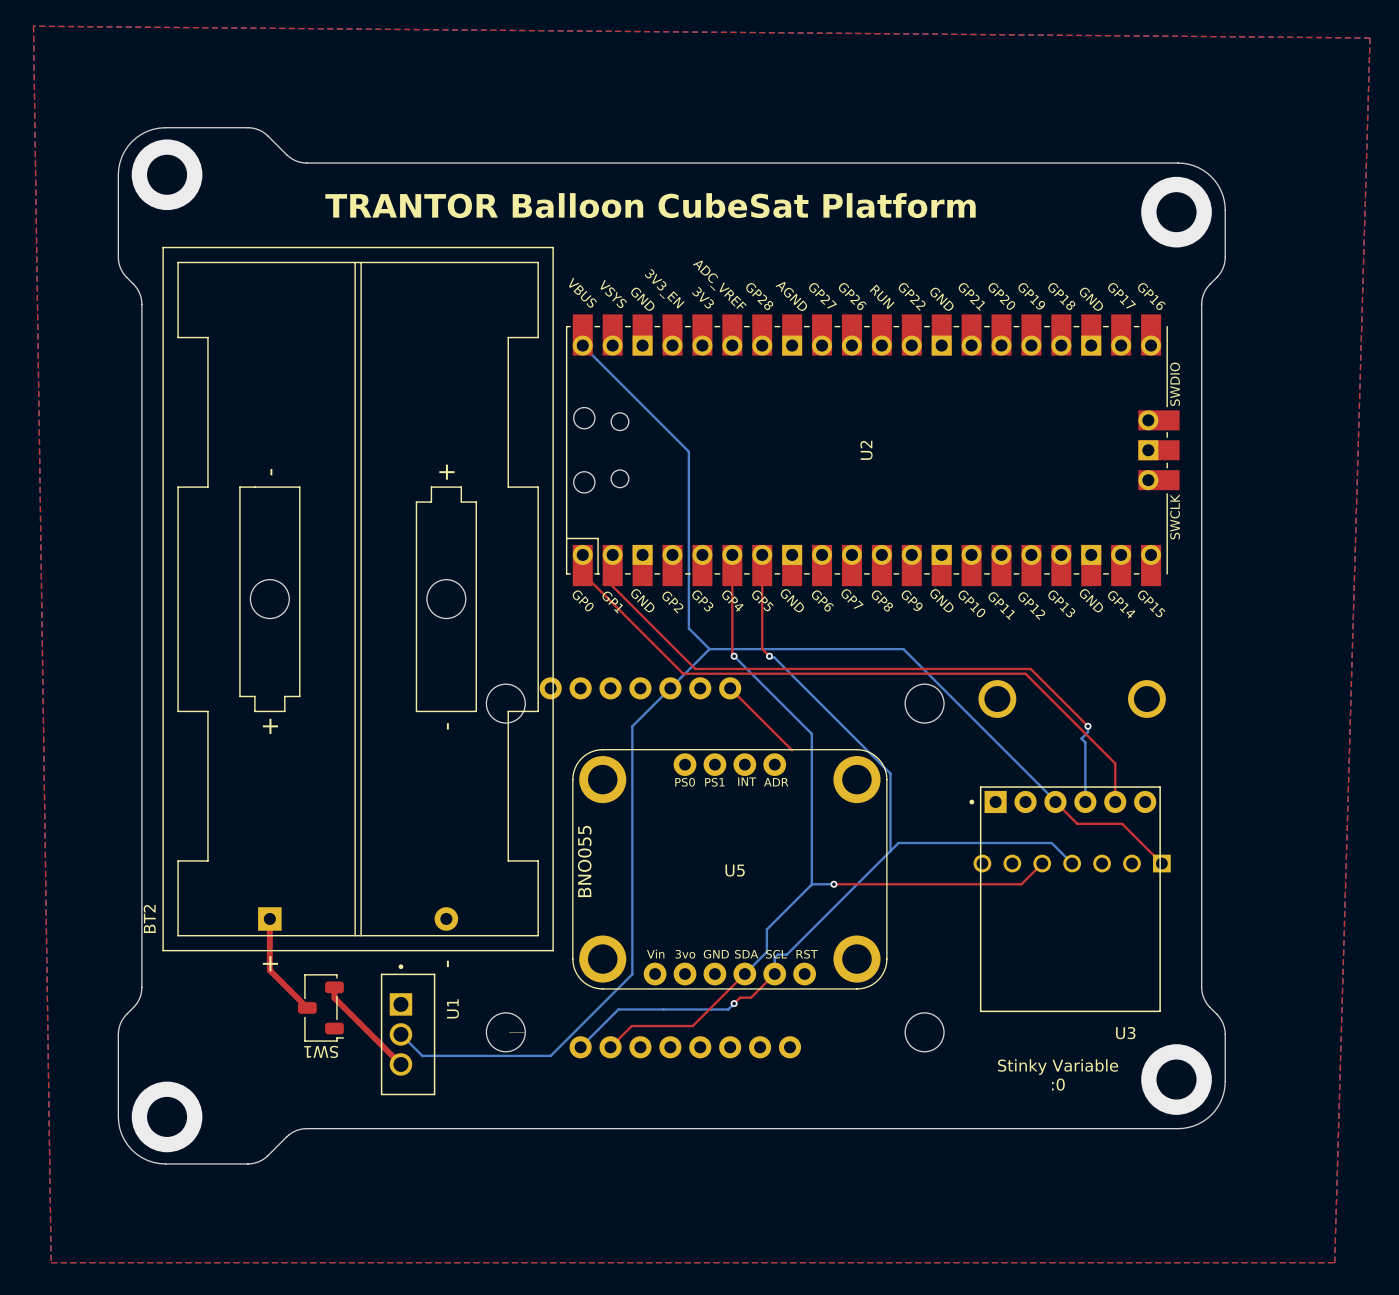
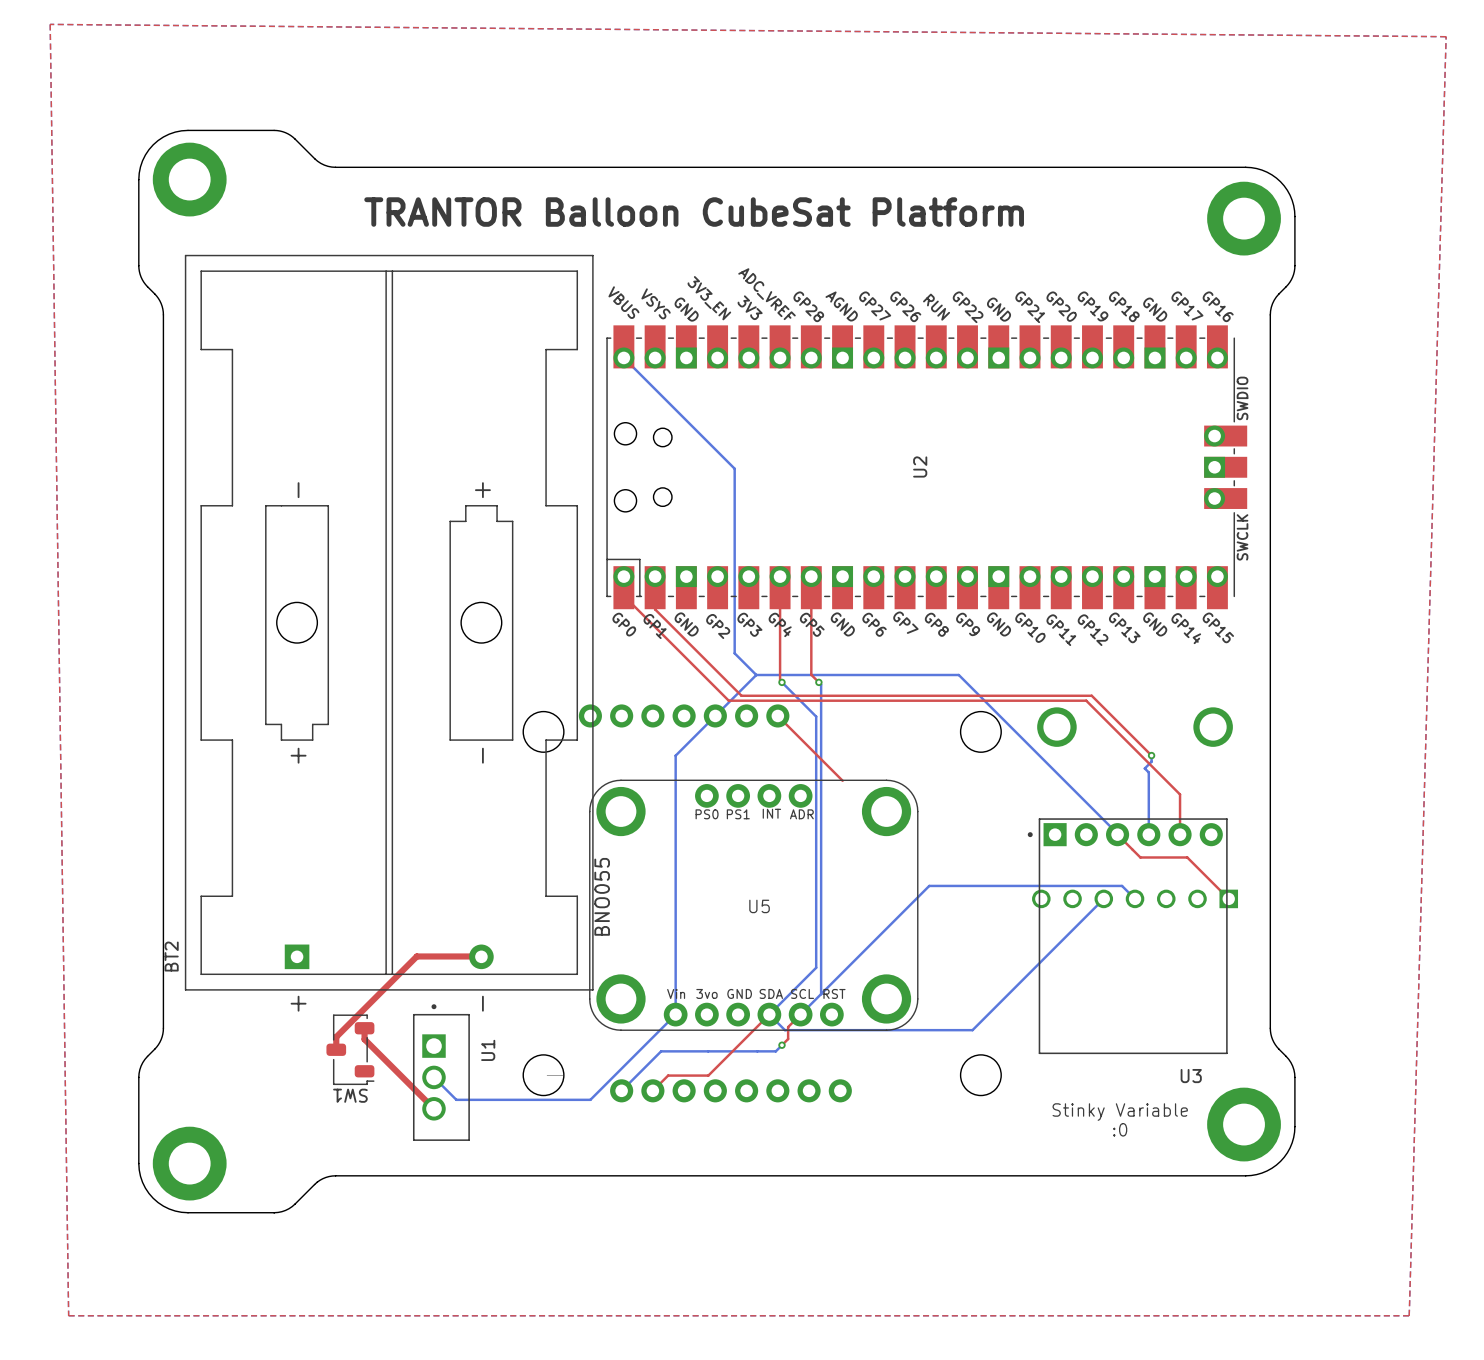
bottom track: (773, 657) (890, 773) (890, 851) -> none
bottom track: none -> (821, 684) (821, 994)
bottom track: (766, 688) (811, 733) (811, 884) -> (816, 716) (816, 967) (769, 1014) (784, 1030) (972, 1030) (1103, 898)
bottom track: (1059, 851) (1051, 843) (898, 843) (786, 954) (777, 954) (774, 957) (774, 974) -> (1122, 885) (929, 885) (800, 1014)
top track: (1042, 863) (1021, 884) (833, 884) -> none
U5 position: (729, 869) -> (753, 905)
bottom track: (833, 884) (812, 884) (766, 929) (766, 951) (744, 974) -> none
via: (833, 884) -> none
top track: (269, 918) (269, 970) (307, 1007) -> (483, 956) (416, 956) (336, 1037) (336, 1049)
top track: (744, 974) (692, 1026) (631, 1026) (625, 1032) -> (769, 1014) (708, 1075) (668, 1075)
top track: (774, 974) (751, 997) (740, 997) -> (800, 1014) (788, 1027) (788, 1039)

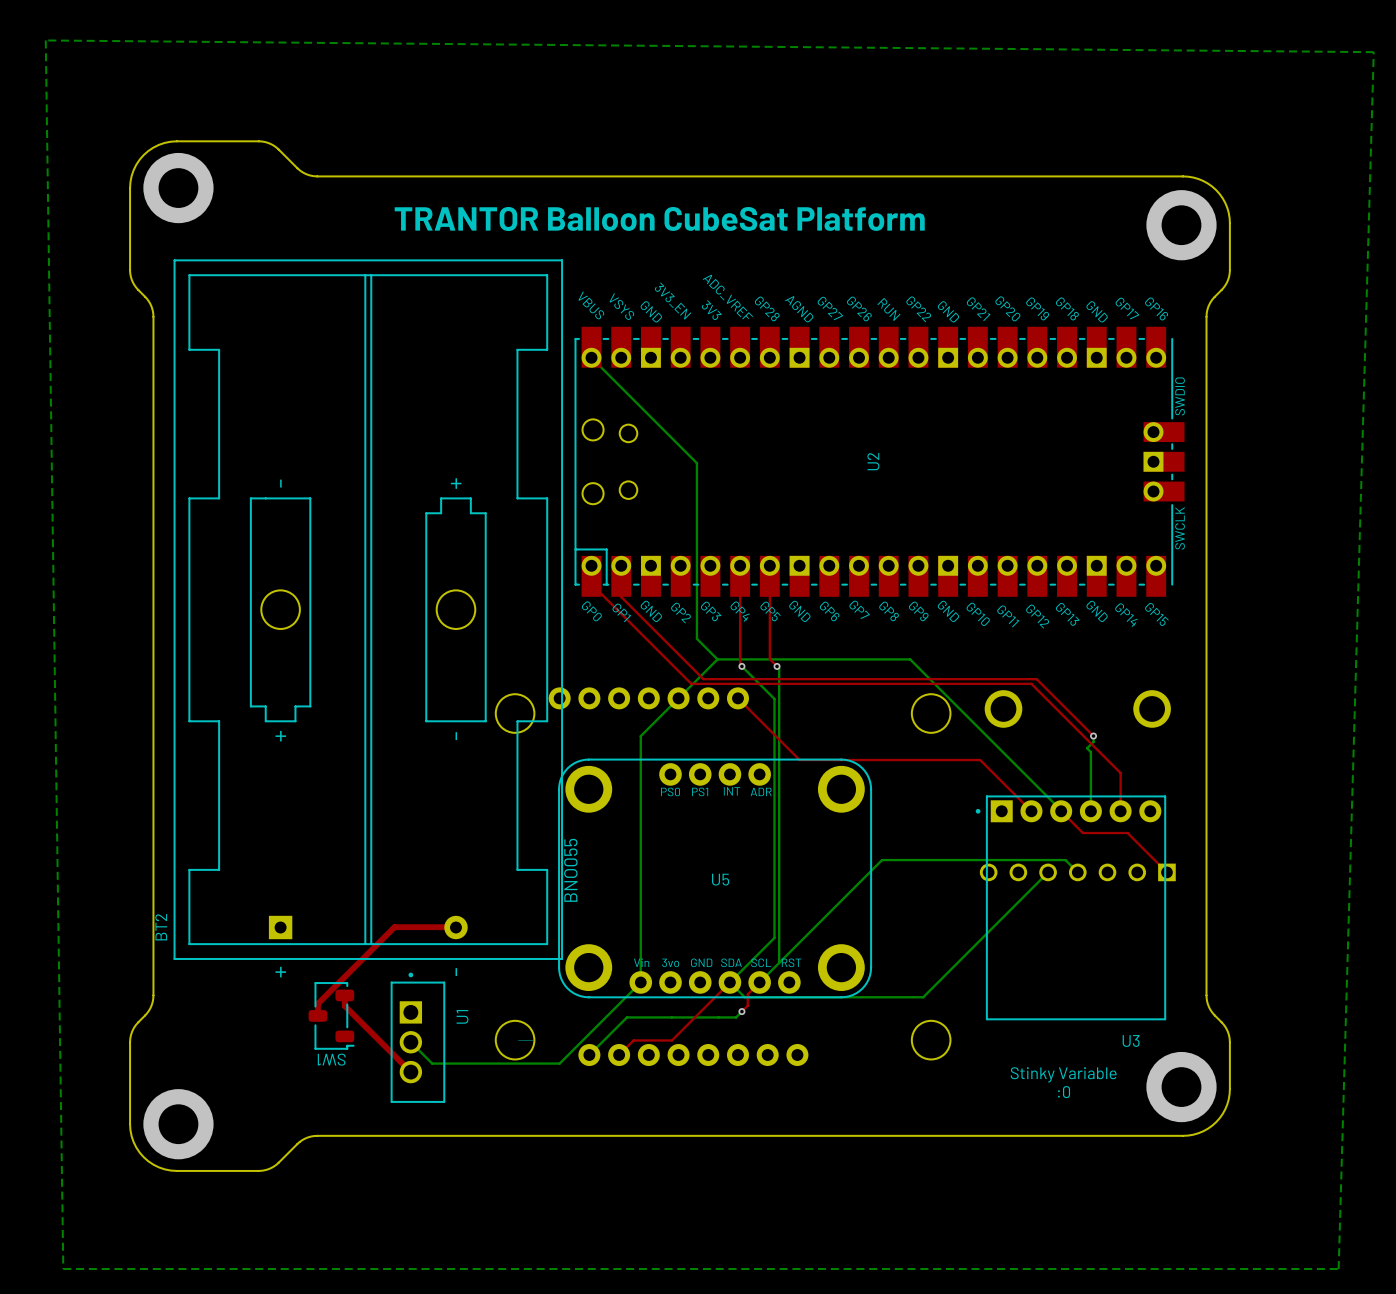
top zone outline: (50, 24) (68, 1315) (1409, 1315) (1446, 36) (50, 24) -> none
top track: none -> (799, 760) (980, 760) (1031, 811)

